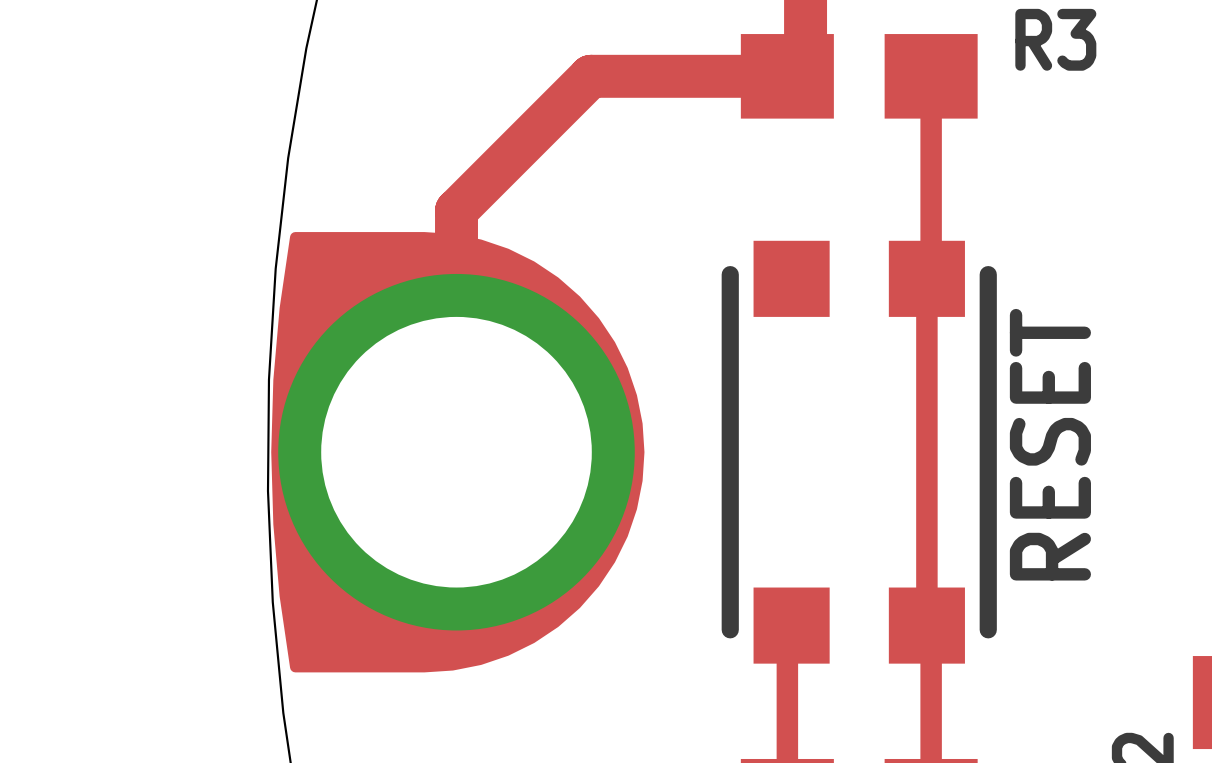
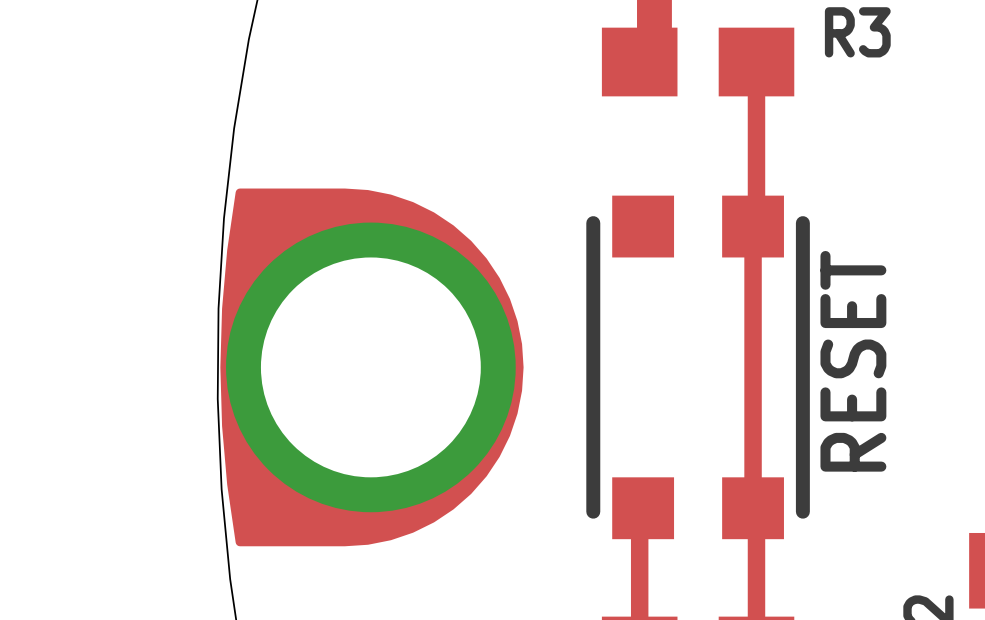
track: (787, 76) (590, 76) (456, 210) (456, 452) -> none

